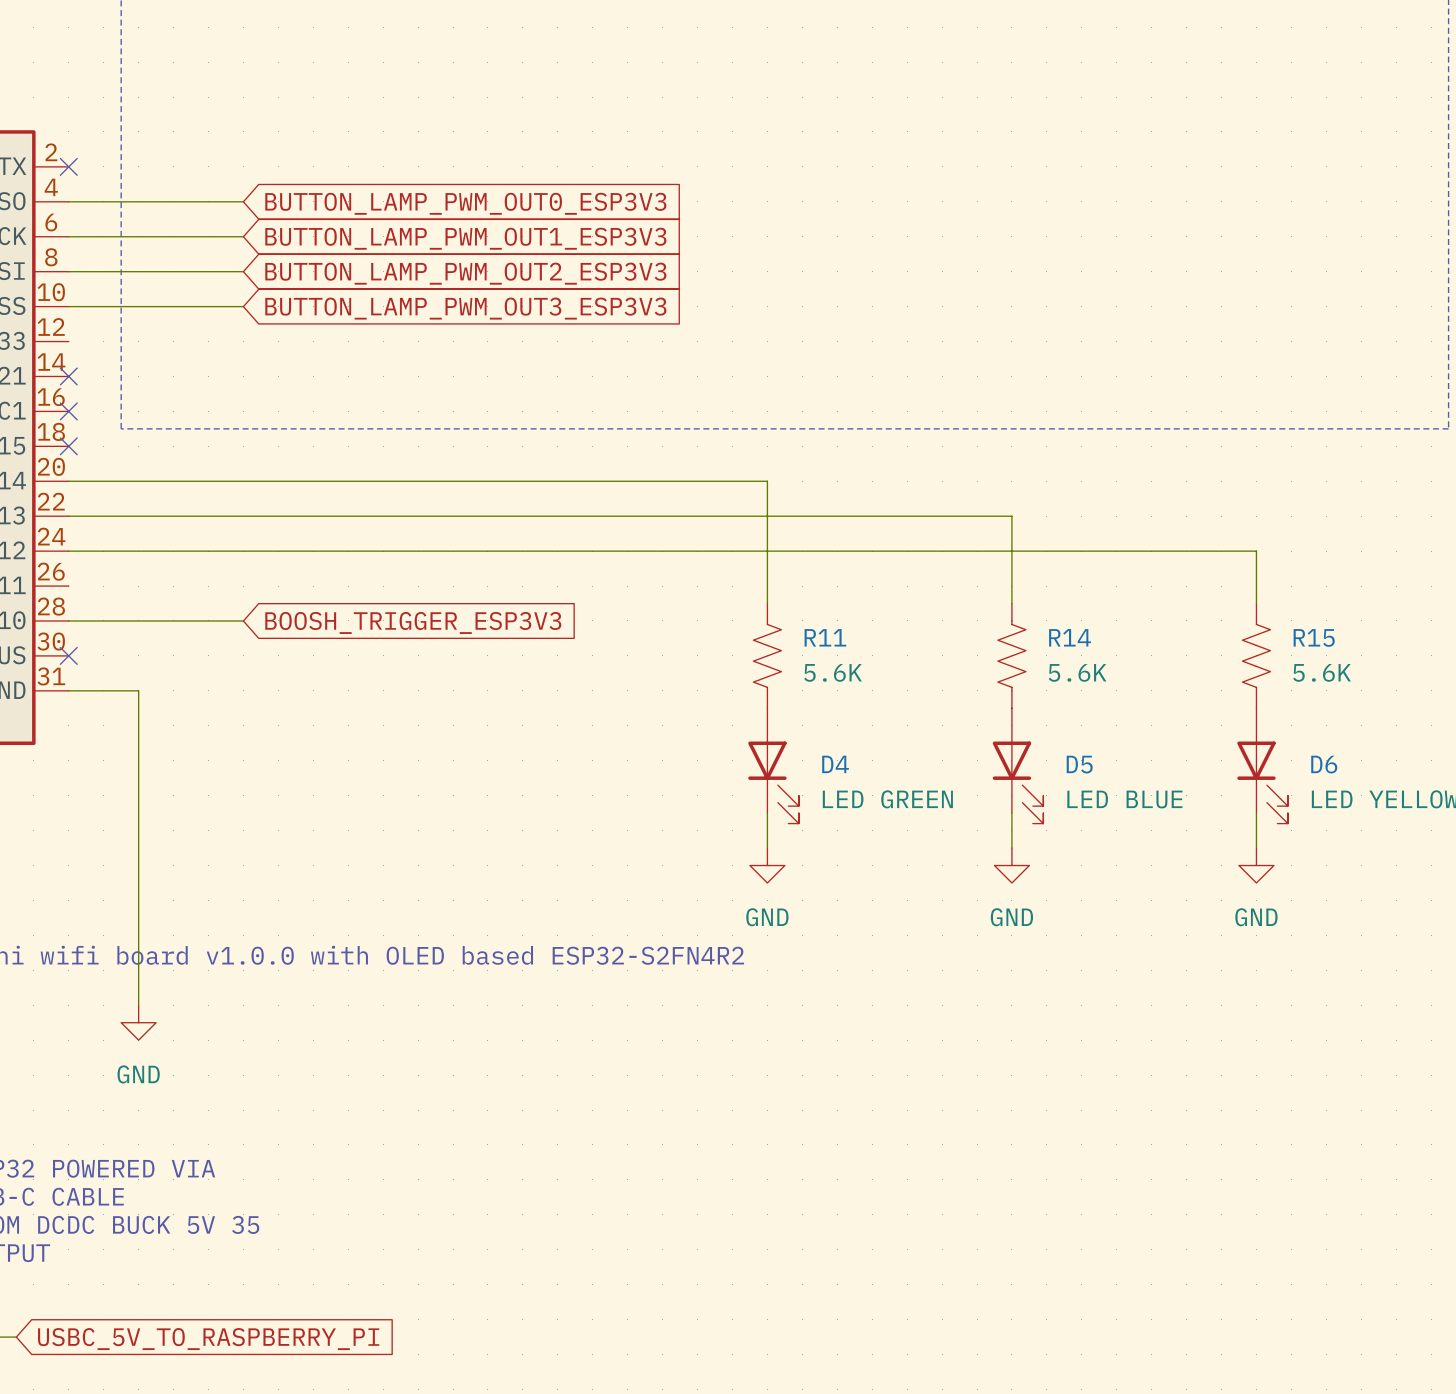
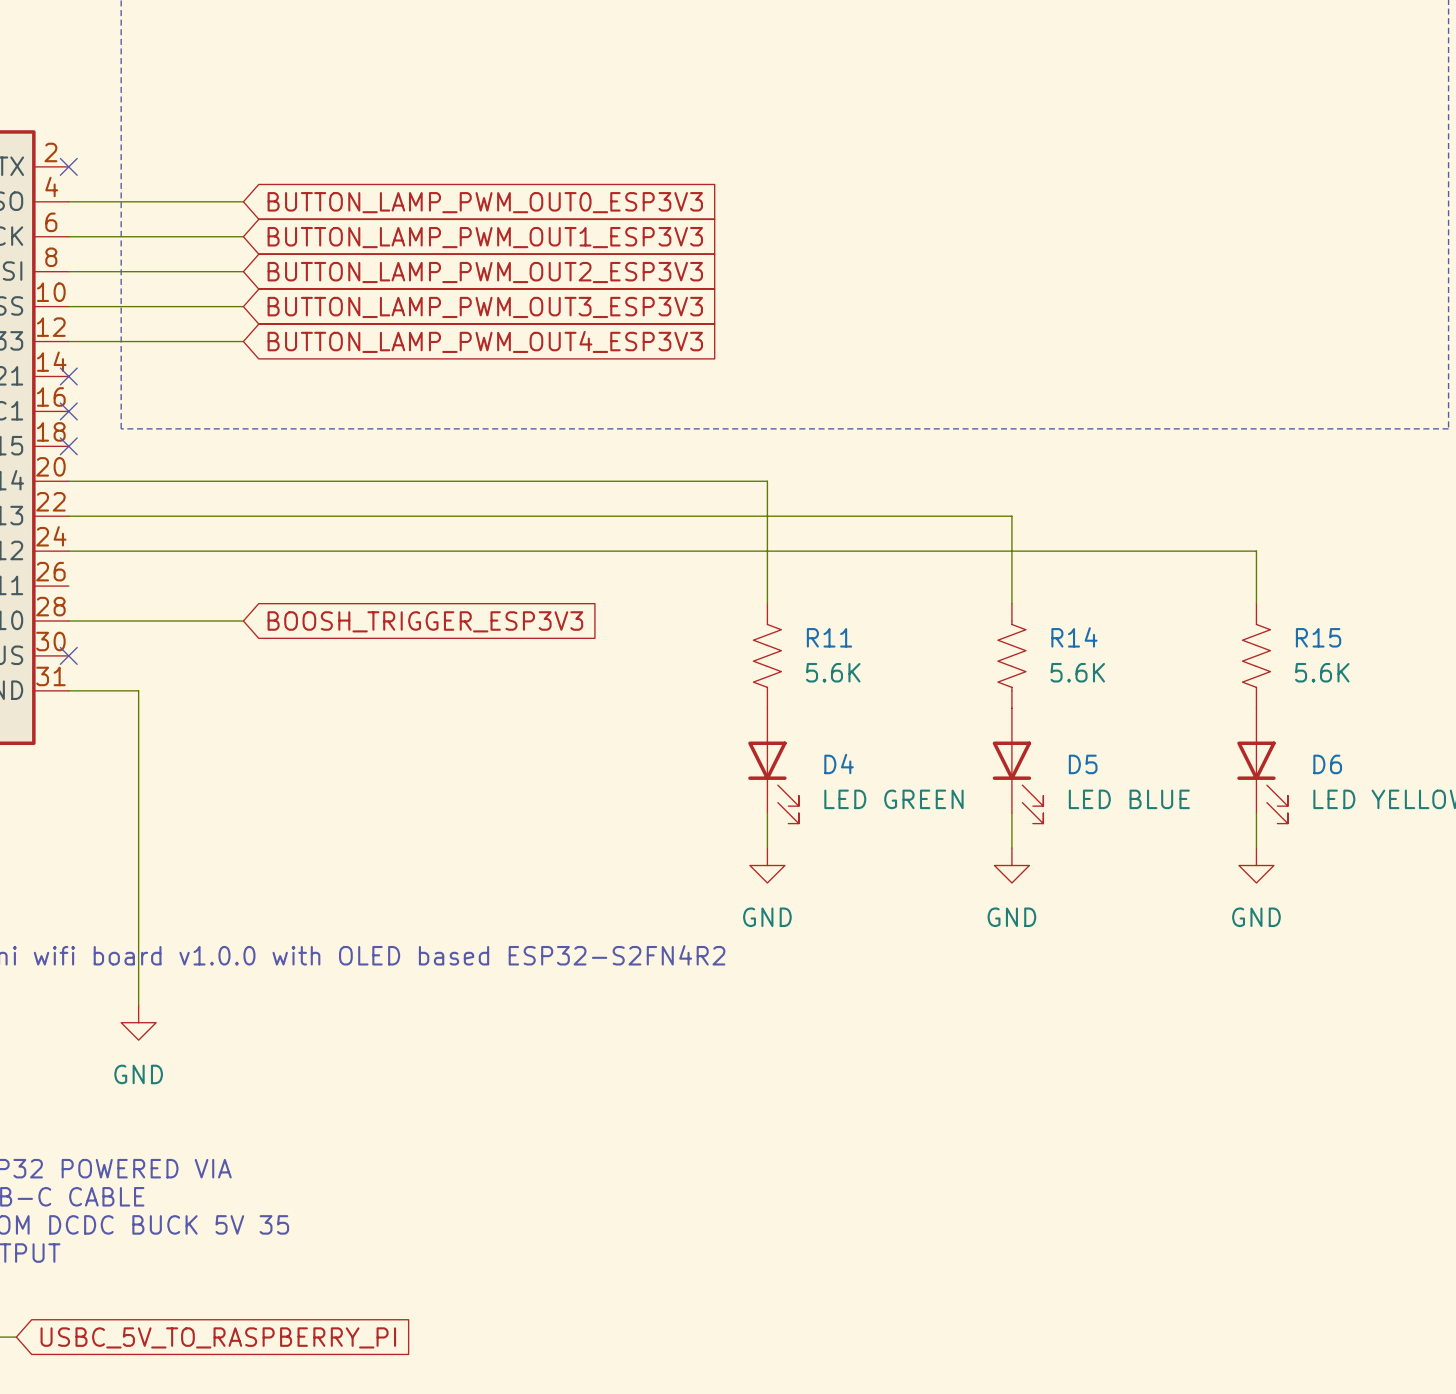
wire: none -> (68, 341) (243, 341)
global label: none -> BUTTON_LAMP_PWM_OUT4_ESP3V3 (485, 341)

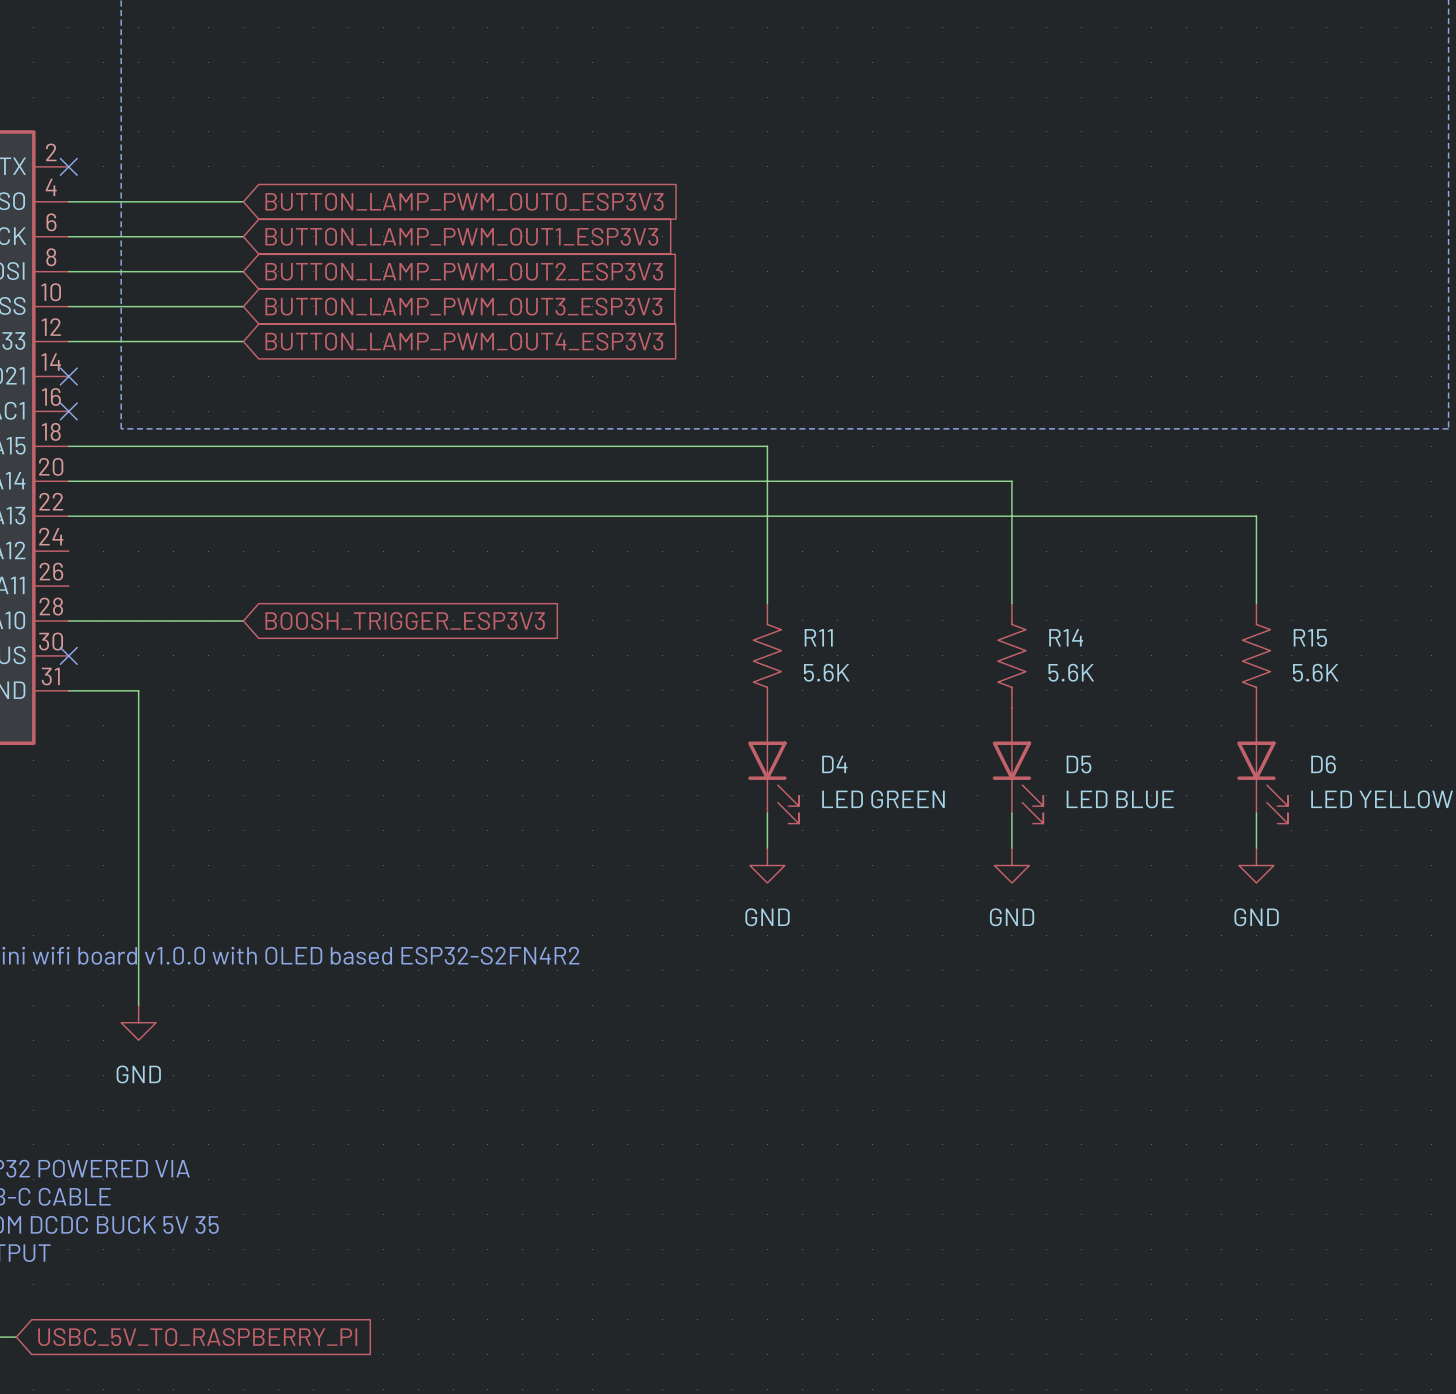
no-connect mark: (68, 446) -> none
wire: (68, 551) (1256, 551) -> (68, 446) (767, 446) (767, 481) (1011, 481) (1011, 516) (1256, 516) (1256, 551)

